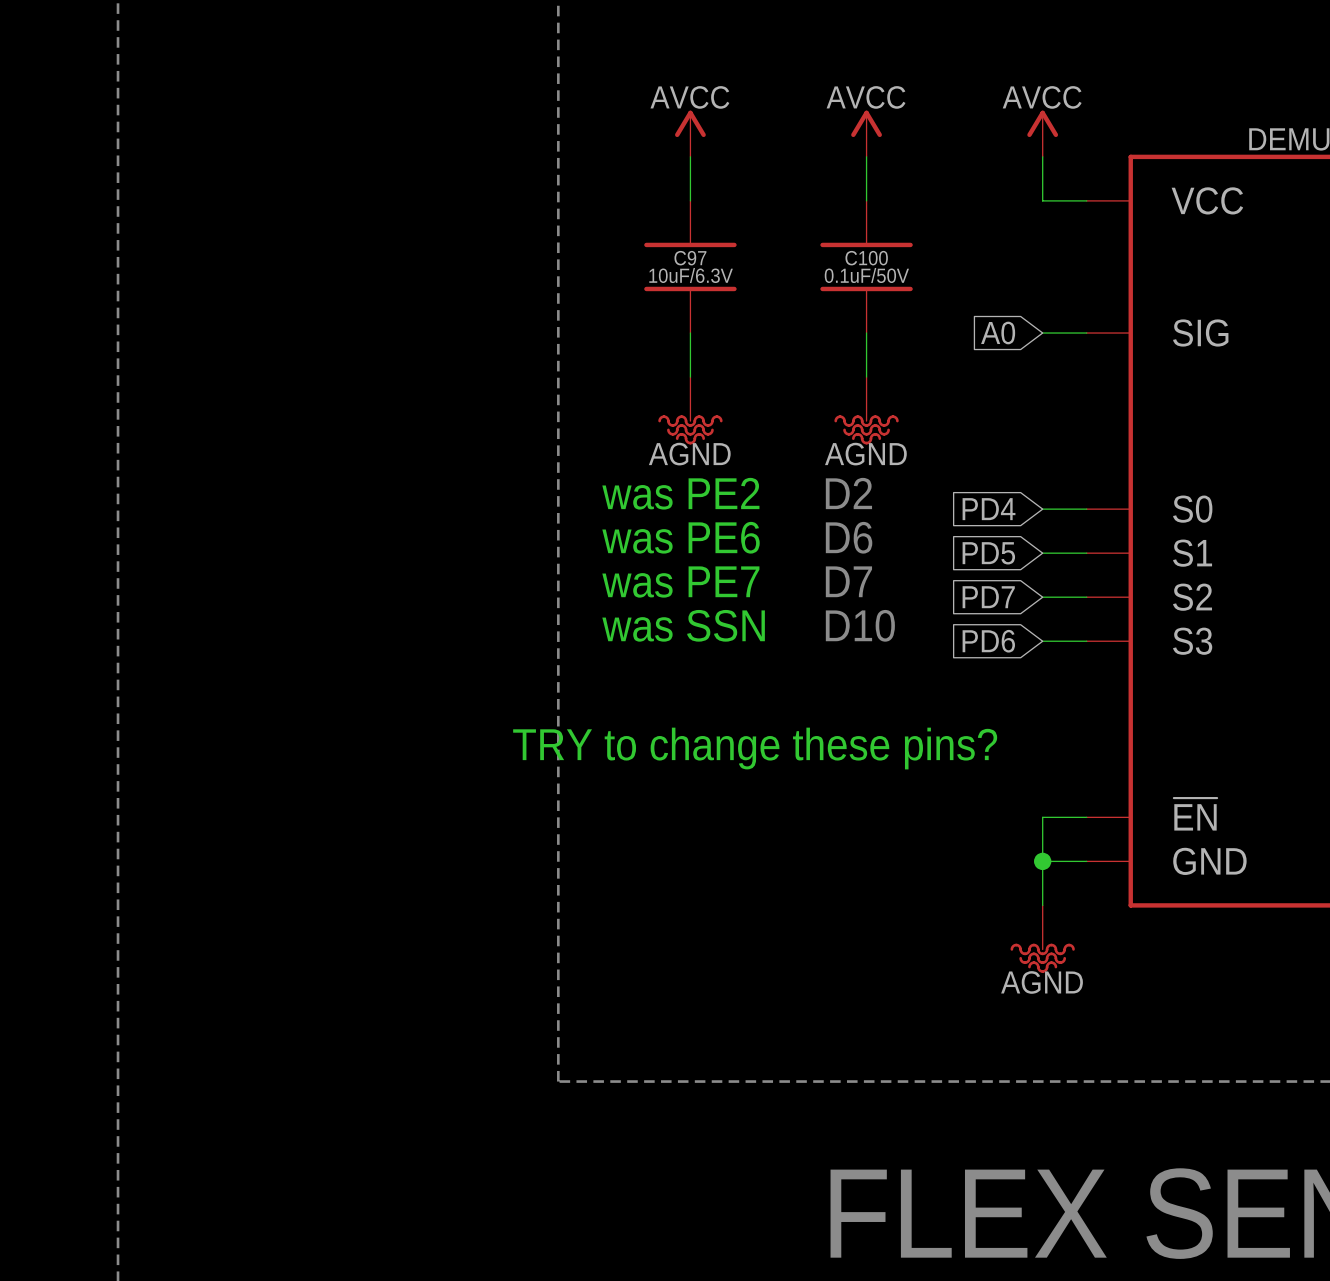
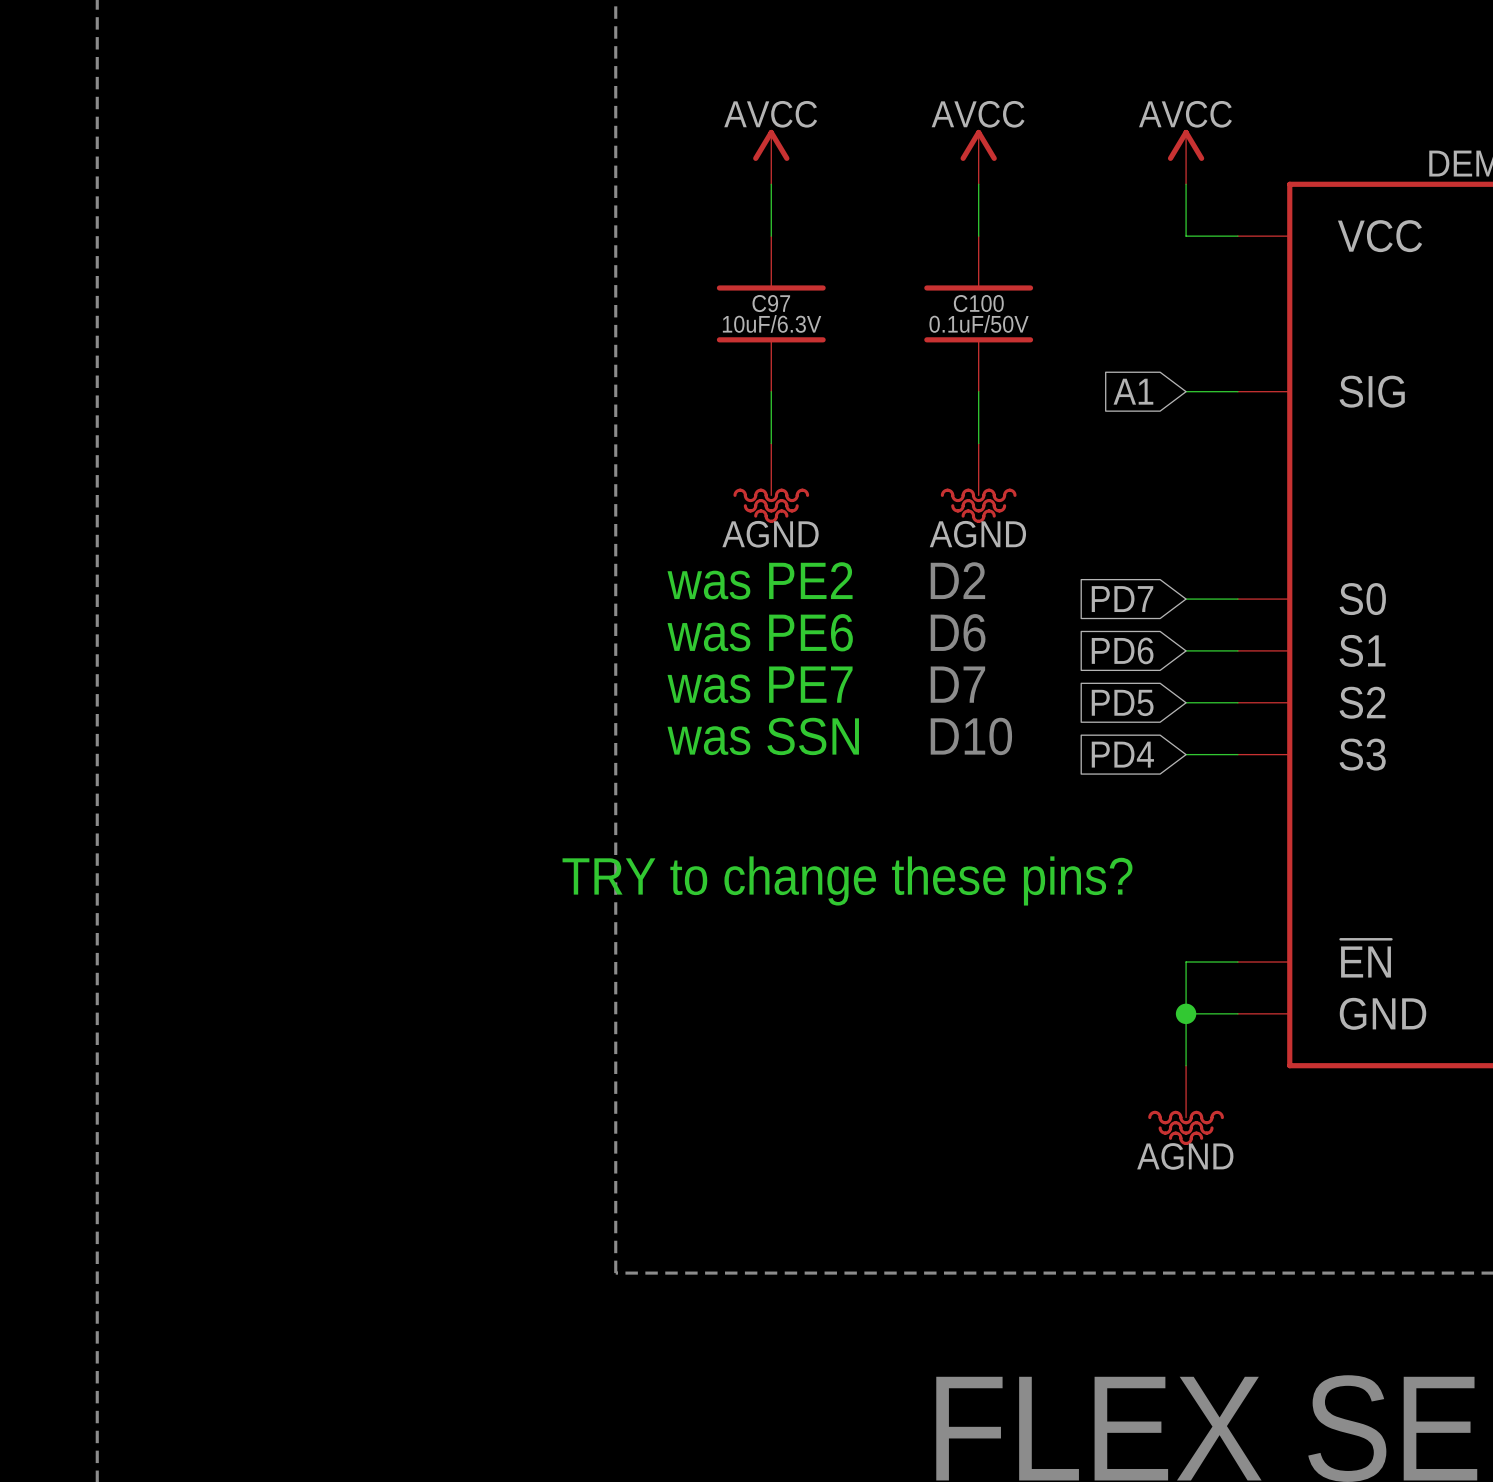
global label: A0 (998, 333) -> A1 (1133, 391)
global label: PD4 (989, 509) -> PD7 (1122, 599)
global label: PD5 (988, 553) -> PD6 (1122, 650)
global label: PD7 (988, 597) -> PD5 (1122, 702)
global label: PD6 (988, 641) -> PD4 (1122, 754)

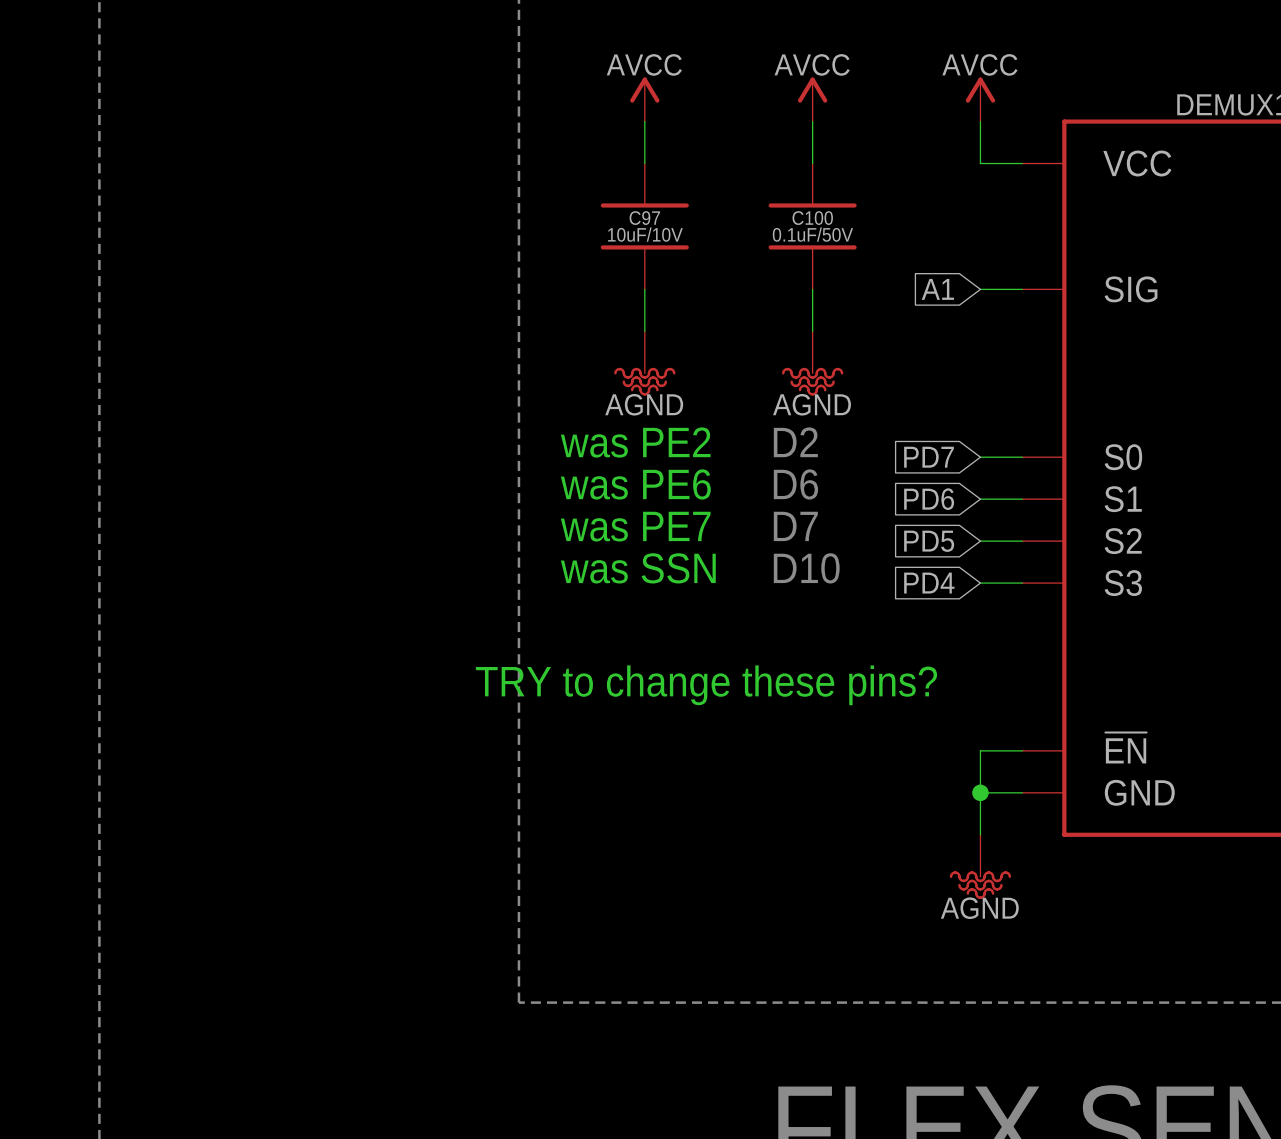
C97 value: 10uF/6.3V (772, 323) -> 10uF/10V (645, 234)

